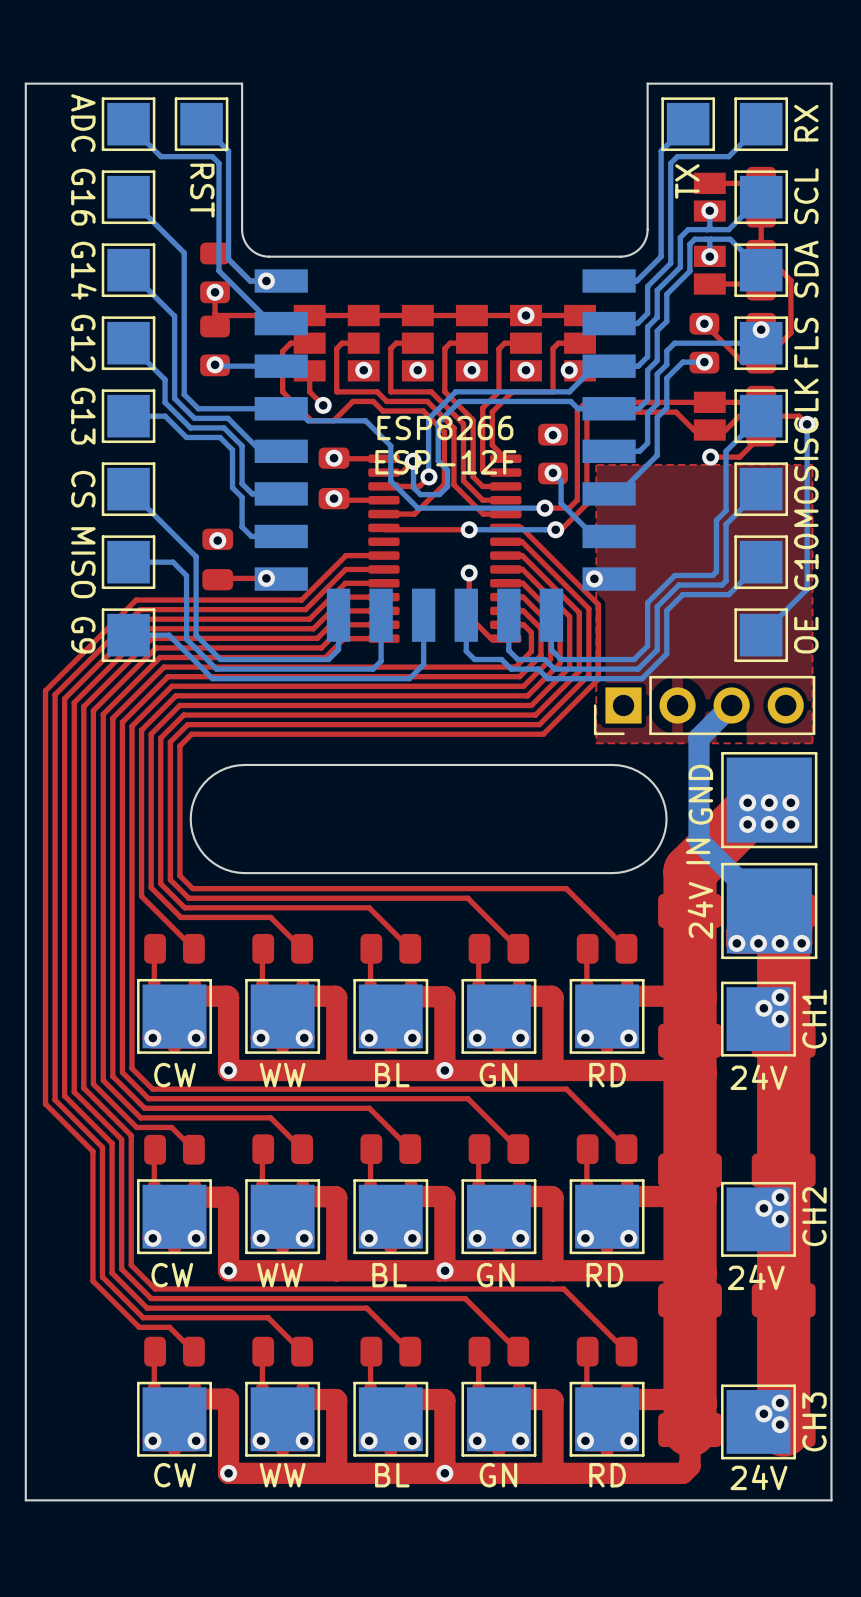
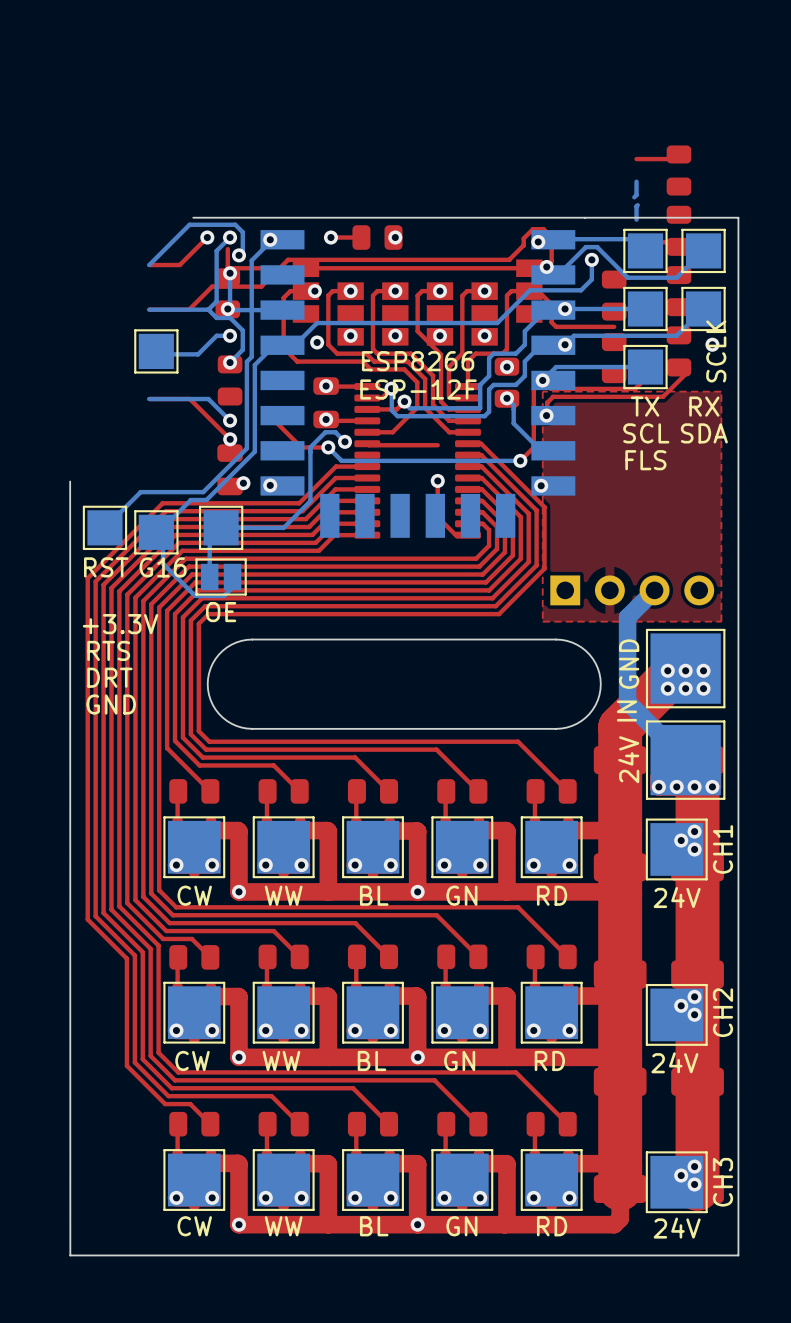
board edge: (831, 83) (647, 83) (647, 232) (644, 241) (639, 248) (629, 255) (620, 256) (260, 255) (247, 246) (242, 232) (242, 83) (25, 83) (25, 1500) (831, 1500) (831, 83) -> none
text: ADC (83, 123) -> none
text rotation: 0° (806, 123) -> 90° clockwise (704, 406)
text position: RX (806, 123) -> RX (704, 406)
bottom track: (128, 124) (160, 156) (212, 156) (219, 163) (219, 270) (271, 323) (296, 323) -> none
part: (128, 124) -> none
bottom track: (201, 124) (228, 151) (228, 259) (250, 281) (296, 281) -> none
part: (201, 124) -> none
bottom track: (688, 124) (661, 151) (661, 256) (636, 281) (594, 281) -> (645, 250) (633, 239) (541, 239) (538, 241) (541, 239)
part: (688, 124) -> none
bottom track: (761, 124) (728, 156) (677, 156) (670, 163) (670, 263) (647, 286) (647, 313) (637, 323) (614, 323) -> (703, 250) (676, 277) (627, 277) (597, 247) (585, 247) (558, 274)
part: (761, 124) -> none
text rotation: 0° (687, 181) -> 90° clockwise (645, 406)
text position: TX (687, 181) -> TX (645, 406)
text rotation: 0° (202, 190) -> 90° counterclockwise (106, 567)
text position: RST (202, 190) -> RST (106, 567)
text rotation: 0° (806, 196) -> 90° clockwise (646, 433)
text position: SCL (806, 196) -> SCL (646, 433)
text rotation: 0° (83, 197) -> 90° counterclockwise (163, 567)
text position: G16 (83, 197) -> G16 (163, 567)
bottom track: (128, 197) (184, 252) (184, 394) (198, 408) (271, 408) -> (232, 576) (232, 587) (224, 595) (195, 595) (163, 563) (163, 527) (190, 500) (206, 500) (254, 451) (254, 365) (274, 345)
part: (128, 197) -> none
part: (709, 197) -> none
bottom track: (761, 197) (728, 229) (688, 229) (680, 237) (680, 267) (657, 290) (657, 317) (647, 327) (647, 356) (638, 366) (594, 366) -> none
part: (761, 197) -> none
via: (709, 210) -> none
top track: (761, 216) (761, 250) (790, 280) (790, 332) (761, 362) (743, 362) (704, 323) -> none
board edge: none -> (193, 217) (738, 217) (738, 1255) (70, 1255) (70, 481)
via: (709, 256) -> none
text rotation: 0° (806, 269) -> 90° clockwise (704, 433)
text position: SDA (806, 269) -> SDA (704, 433)
text: G14 (83, 270) -> none
bottom track: (128, 270) (174, 316) (174, 398) (194, 418) (228, 418) (261, 451) (296, 451) -> none
part: (128, 270) -> none
part: (709, 270) -> none
bottom track: (761, 270) (730, 239) (694, 239) (689, 244) (689, 271) (666, 294) (666, 321) (657, 330) (657, 360) (647, 370) (647, 399) (638, 408) (578, 408) (570, 401) (459, 401) (438, 422) (438, 460) (447, 470) (447, 486) (439, 494) -> (541, 345) (524, 361) (524, 375) (515, 384) (493, 384) (489, 389) (489, 411) (484, 416) (413, 416)
part: (761, 270) -> none
part: (215, 272) -> none
top track: none -> (207, 237) (179, 265) (149, 265)
via: none -> (207, 237)
bottom track: none -> (230, 237) (216, 250) (216, 301) (208, 309)
via: none -> (230, 237)
via: none -> (330, 237)
top track: none -> (361, 237) (332, 237)
part: none -> (377, 237)
via: none -> (395, 237)
bottom track: none -> (270, 241) (251, 260) (251, 356) (246, 361) (246, 448) (203, 492) (140, 492) (104, 527)
via: none -> (538, 241)
via: (215, 292) -> none
part: none -> (645, 250)
part: none -> (703, 250)
bottom track: none -> (238, 255) (242, 251) (242, 232) (235, 224) (189, 224) (149, 265)
via: none -> (238, 255)
via: none -> (591, 259)
top track: none -> (546, 266) (551, 262) (551, 237) (543, 229) (532, 229) (523, 238) (523, 245) (509, 259) (288, 259) (261, 286) (212, 286) (189, 309) (149, 309)
via: none -> (546, 266)
via: (525, 315) -> none
bottom track: none -> (230, 273) (230, 304)
via: none -> (230, 273)
via: (704, 323) -> none
via: (761, 329) -> none
text rotation: 0° (806, 342) -> 90° clockwise (645, 460)
text position: FLS (806, 342) -> FLS (645, 460)
text: G12 (83, 343) -> none
bottom track: (128, 343) (165, 379) (165, 402) (190, 427) (224, 427) (242, 445) (242, 483) (252, 493) (296, 493) -> none
part: (128, 343) -> none
via: none -> (314, 291)
part position: (363, 343) -> (350, 313)
via: none -> (350, 291)
part position: (417, 343) -> (395, 313)
via: none -> (395, 291)
part position: (471, 343) -> (439, 313)
via: none -> (439, 291)
part position: (525, 343) -> (484, 313)
via: none -> (484, 291)
top track: none -> (529, 291) (538, 291) (551, 304) (551, 322) (556, 326) (614, 326)
part position: (704, 343) -> (614, 295)
bottom track: (761, 343) (674, 343) (666, 351) (666, 364) (657, 374) (657, 403) (647, 413) (647, 443) (639, 451) (594, 451) -> none
part: (761, 343) -> none
bottom track: (704, 362) (682, 362) (666, 378) (666, 407) (657, 417) (657, 455) (618, 493) (594, 493) -> none
via: (704, 362) -> none
via: none -> (565, 308)
bottom track: none -> (645, 308) (565, 308)
part: none -> (645, 308)
bottom track: none -> (703, 308) (676, 335) (573, 335) (565, 344)
part: none -> (703, 308)
bottom track: none -> (208, 309) (216, 317) (230, 317) (242, 330) (242, 349) (230, 362)
bottom track: none -> (208, 309) (149, 309)
bottom track: (594, 367) (569, 391) (455, 391) (428, 418) (428, 476) -> (541, 310) (541, 315) (524, 331) (524, 344) (515, 353) (493, 353) (489, 358) (489, 375) (480, 384) (480, 408) (409, 408) (404, 402)
top track: (309, 370) (309, 391) (323, 405) -> none
via: (363, 370) -> none
via: (417, 370) -> none
via: (471, 370) -> none
via: (525, 370) -> none
via: (569, 370) -> none
top track: (282, 391) (311, 420) (333, 420) (352, 401) (373, 401) (382, 411) (423, 411) (444, 432) (444, 453) -> (283, 331) (283, 347) (297, 361) (362, 361) (370, 369) (404, 369) (417, 382)
top track: (336, 391) (377, 391) (386, 401) (427, 401) (453, 428) (453, 449) -> (328, 331) (328, 344) (337, 353) (366, 353) (374, 361) (407, 361) (425, 379)
top track: (390, 391) (431, 391) (463, 424) (463, 445) -> (372, 331) (372, 349) (377, 353) (410, 353) (433, 375)
top track: (498, 391) (482, 408) (482, 435) -> (462, 331) (462, 353) (448, 367)
top track: (553, 391) (512, 391) (492, 412) (492, 445) (505, 458) -> (506, 331) (506, 349) (502, 353) (475, 353) (468, 361) (468, 386)
top track: (761, 396) (755, 402) (585, 402) (577, 410) (577, 500) (569, 508) (544, 508) -> none
bottom track: none -> (230, 335) (216, 335) (198, 354) (149, 354)
via: none -> (230, 335)
via: none -> (350, 335)
via: none -> (395, 335)
via: none -> (439, 335)
via: none -> (484, 335)
bottom track: (296, 408) (308, 420) (365, 420) (390, 445) (390, 481) (417, 508) (544, 508) -> (294, 345) (317, 323) (497, 323) (530, 290) (581, 290) (591, 279) (591, 259)
via: none -> (565, 344)
text: G13 (83, 416) -> none
bottom track: (128, 416) (165, 416) (186, 437) (220, 437) (232, 449) (232, 487) (242, 497) (242, 527) (251, 536) (296, 536) -> none
part: (709, 416) -> none
bottom track: (761, 416) (726, 451) (726, 510) (716, 520) (716, 571) (712, 575) (674, 575) (647, 602) (647, 646) (634, 659) (561, 659) (551, 649) (551, 600) -> none
part: (761, 416) -> none
part: none -> (614, 358)
top track: (807, 424) (799, 416) (739, 416) (725, 430) (693, 430) (676, 412) (589, 412) (586, 414) (586, 503) (561, 529) (555, 529) -> none
bottom track: (807, 424) (807, 589) (761, 635) -> none
via position: (807, 424) -> (712, 344)
via: none -> (230, 362)
bottom track: none -> (645, 367) (556, 367) (542, 380)
part: none -> (645, 367)
top track: (761, 435) (739, 457) (710, 457) -> none
top track: none -> (649, 374) (635, 388) (551, 388) (542, 380) (533, 389) (533, 447) (520, 460)
top track: none -> (685, 374) (663, 396) (553, 396) (547, 402) (546, 415)
part: none -> (230, 380)
via: none -> (542, 380)
via: (710, 457) -> none
top track: none -> (149, 399) (189, 399) (230, 439)
bottom track: none -> (149, 399) (208, 399) (230, 420)
text: CS (83, 489) -> none
bottom track: (128, 489) (196, 556) (196, 635) (220, 659) (328, 659) (338, 649) (338, 600) -> none
part: (128, 489) -> none
bottom track: (761, 489) (726, 524) (726, 581) (722, 585) (678, 585) (657, 606) (657, 649) (638, 669) (554, 669) (544, 659) (517, 659) (508, 650) (508, 600) -> none
part: (761, 489) -> none
text: MOSI (806, 491) -> none
via: none -> (546, 415)
via: none -> (230, 420)
top track: none -> (277, 423) (301, 447) (328, 447)
via: (544, 508) -> none
bottom track: none -> (344, 441) (335, 432) (325, 432) (310, 447) (310, 501) (283, 527) (221, 527) (209, 539) (209, 576)
via: none -> (344, 441)
via: (469, 529) -> none
bottom track: (555, 529) (469, 529) -> none
via position: (555, 529) -> (520, 460)
bottom track: none -> (328, 447) (341, 460) (520, 460)
via: none -> (328, 447)
via position: (217, 540) -> (230, 439)
text: MISO (83, 562) -> none
bottom track: (128, 562) (173, 562) (186, 575) (186, 639) (216, 669) (373, 669) (381, 661) (381, 600) -> none
part: (128, 562) -> none
bottom track: (761, 562) (728, 594) (682, 594) (666, 610) (666, 653) (642, 678) (547, 678) (538, 669) (511, 669) (501, 659) (474, 659) (466, 651) (466, 600) -> none
part: (761, 562) -> none
text: G10 (806, 562) -> none
via: none -> (243, 483)
top track: (266, 578) (217, 579) -> none
bottom track: (423, 600) (423, 664) (409, 678) (212, 678) (169, 635) (128, 635) -> none
part: none -> (104, 527)
part: none -> (221, 527)
text: G9 (83, 635) -> none
part: (761, 635) -> none
text: OE (806, 635) -> none
part: none -> (221, 576)
part side: bottom (704, 705) -> top (632, 590)
text: none -> OE (221, 612)
text: none -> +3.3V (120, 624)
text: none -> RTS (108, 650)
text: none -> DRT (109, 677)
text: none -> GND (111, 704)

